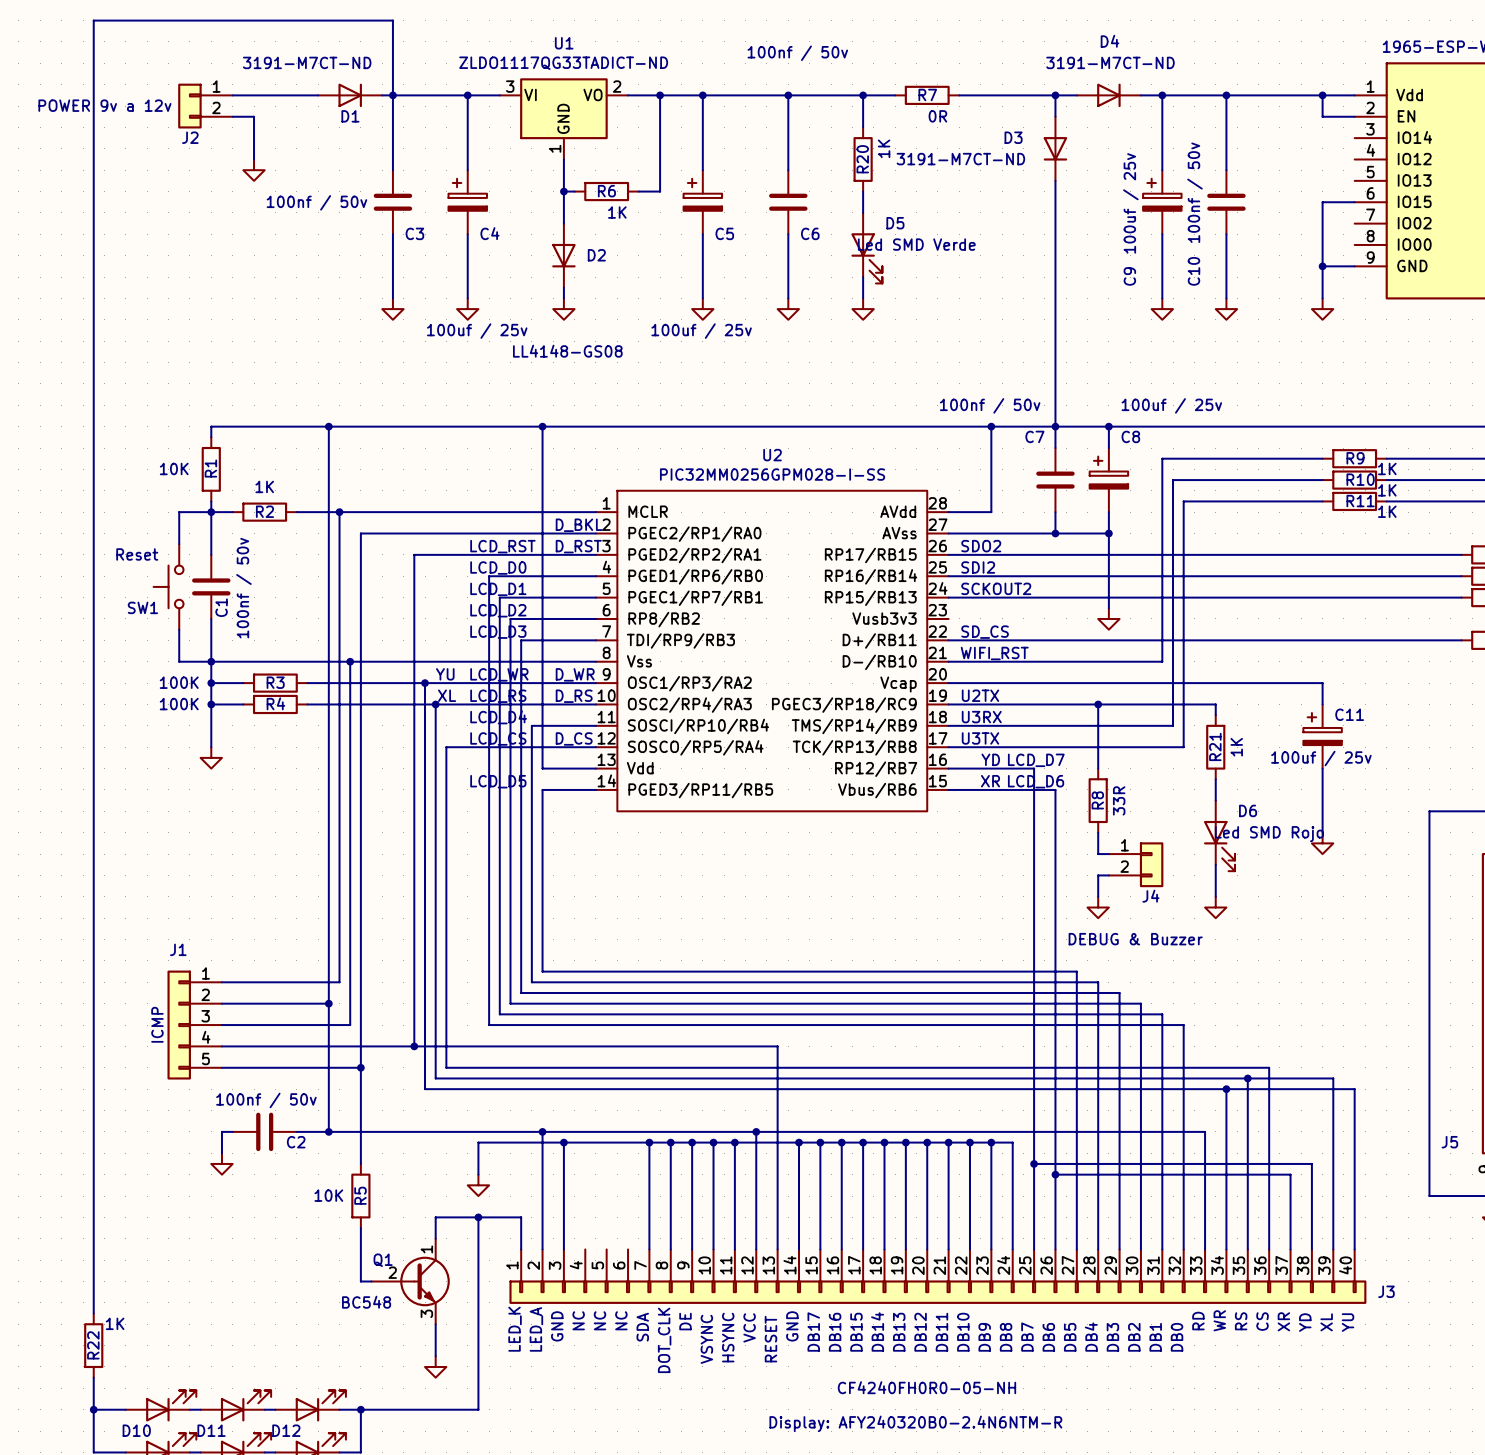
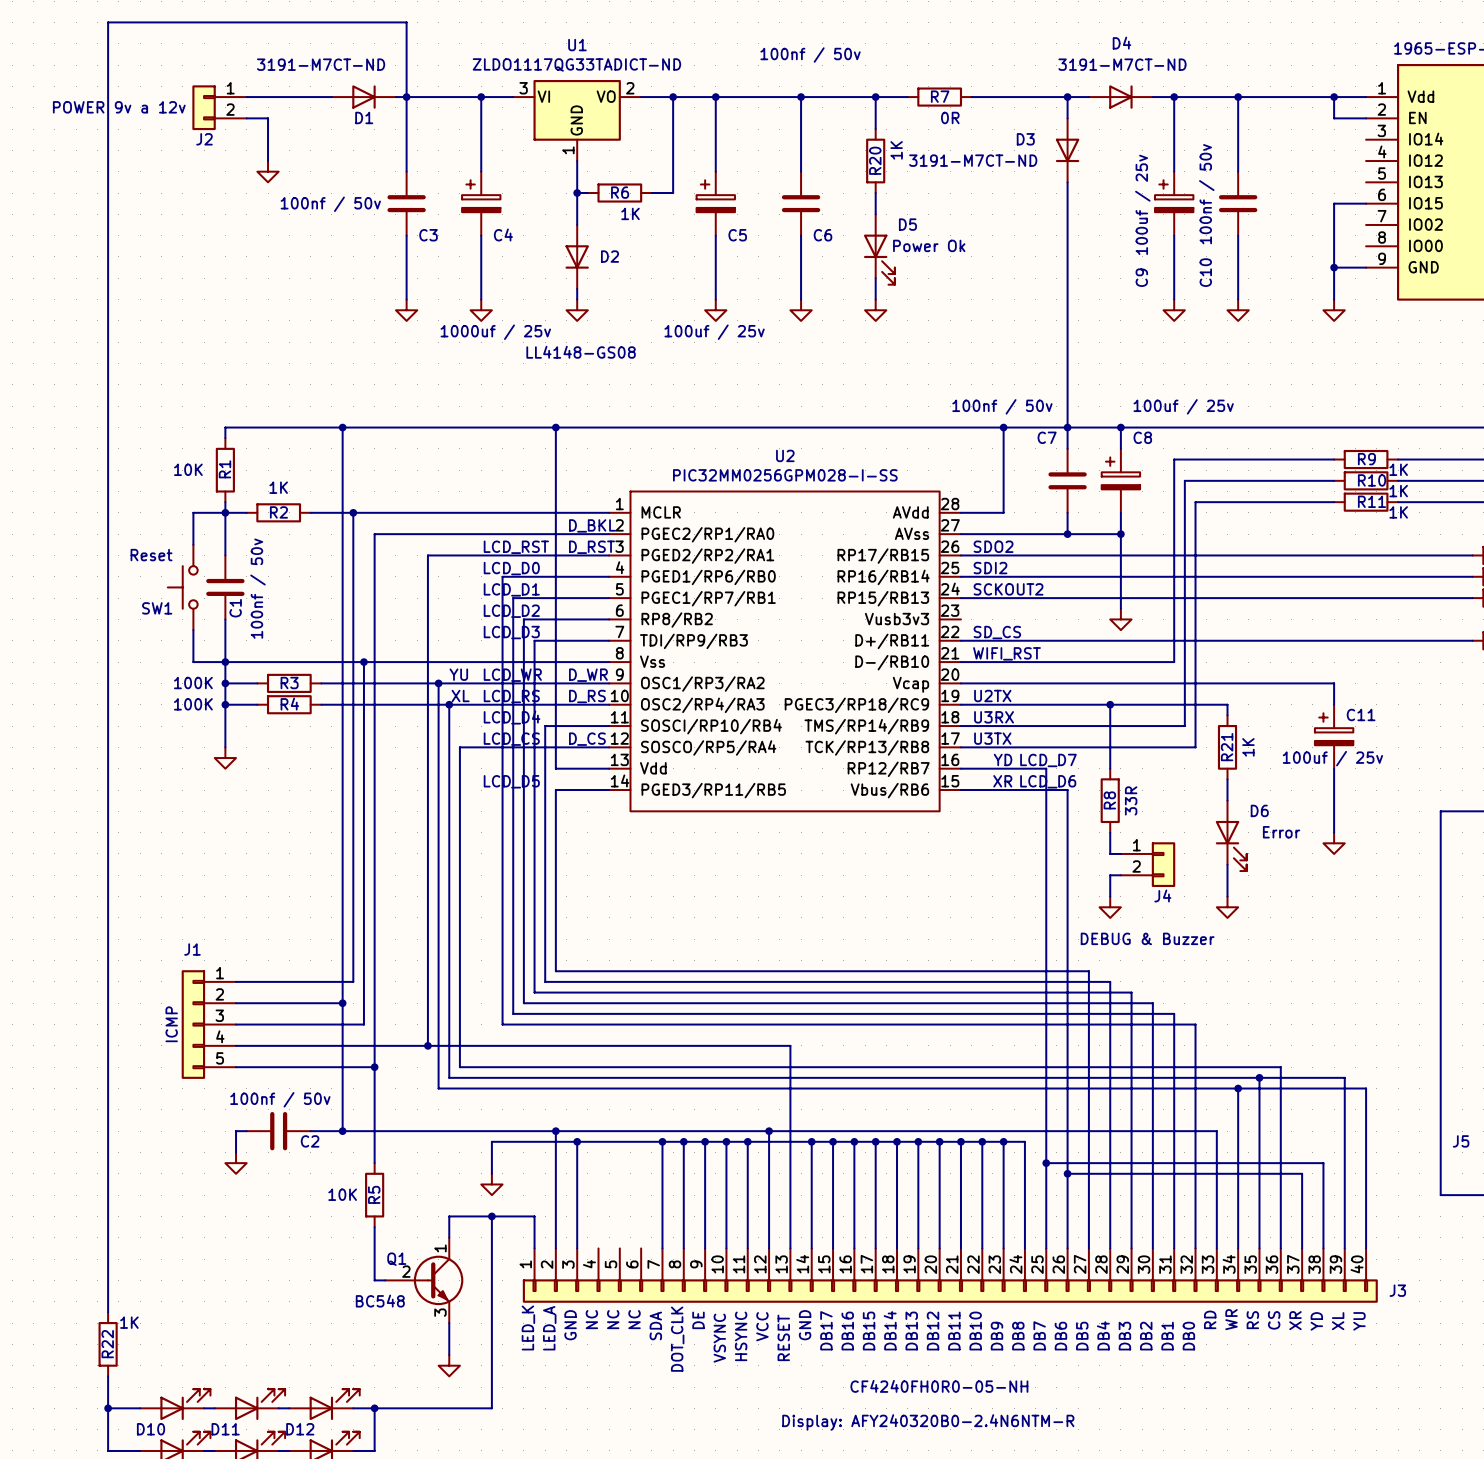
D5 value: Led SMD Verde (916, 244) -> Power Ok (929, 245)
C4 value: 100uf / 25v (477, 331) -> 1000uf / 25v (495, 332)
D6 value: Led SMD Rojo (1269, 834) -> Error (1281, 832)

